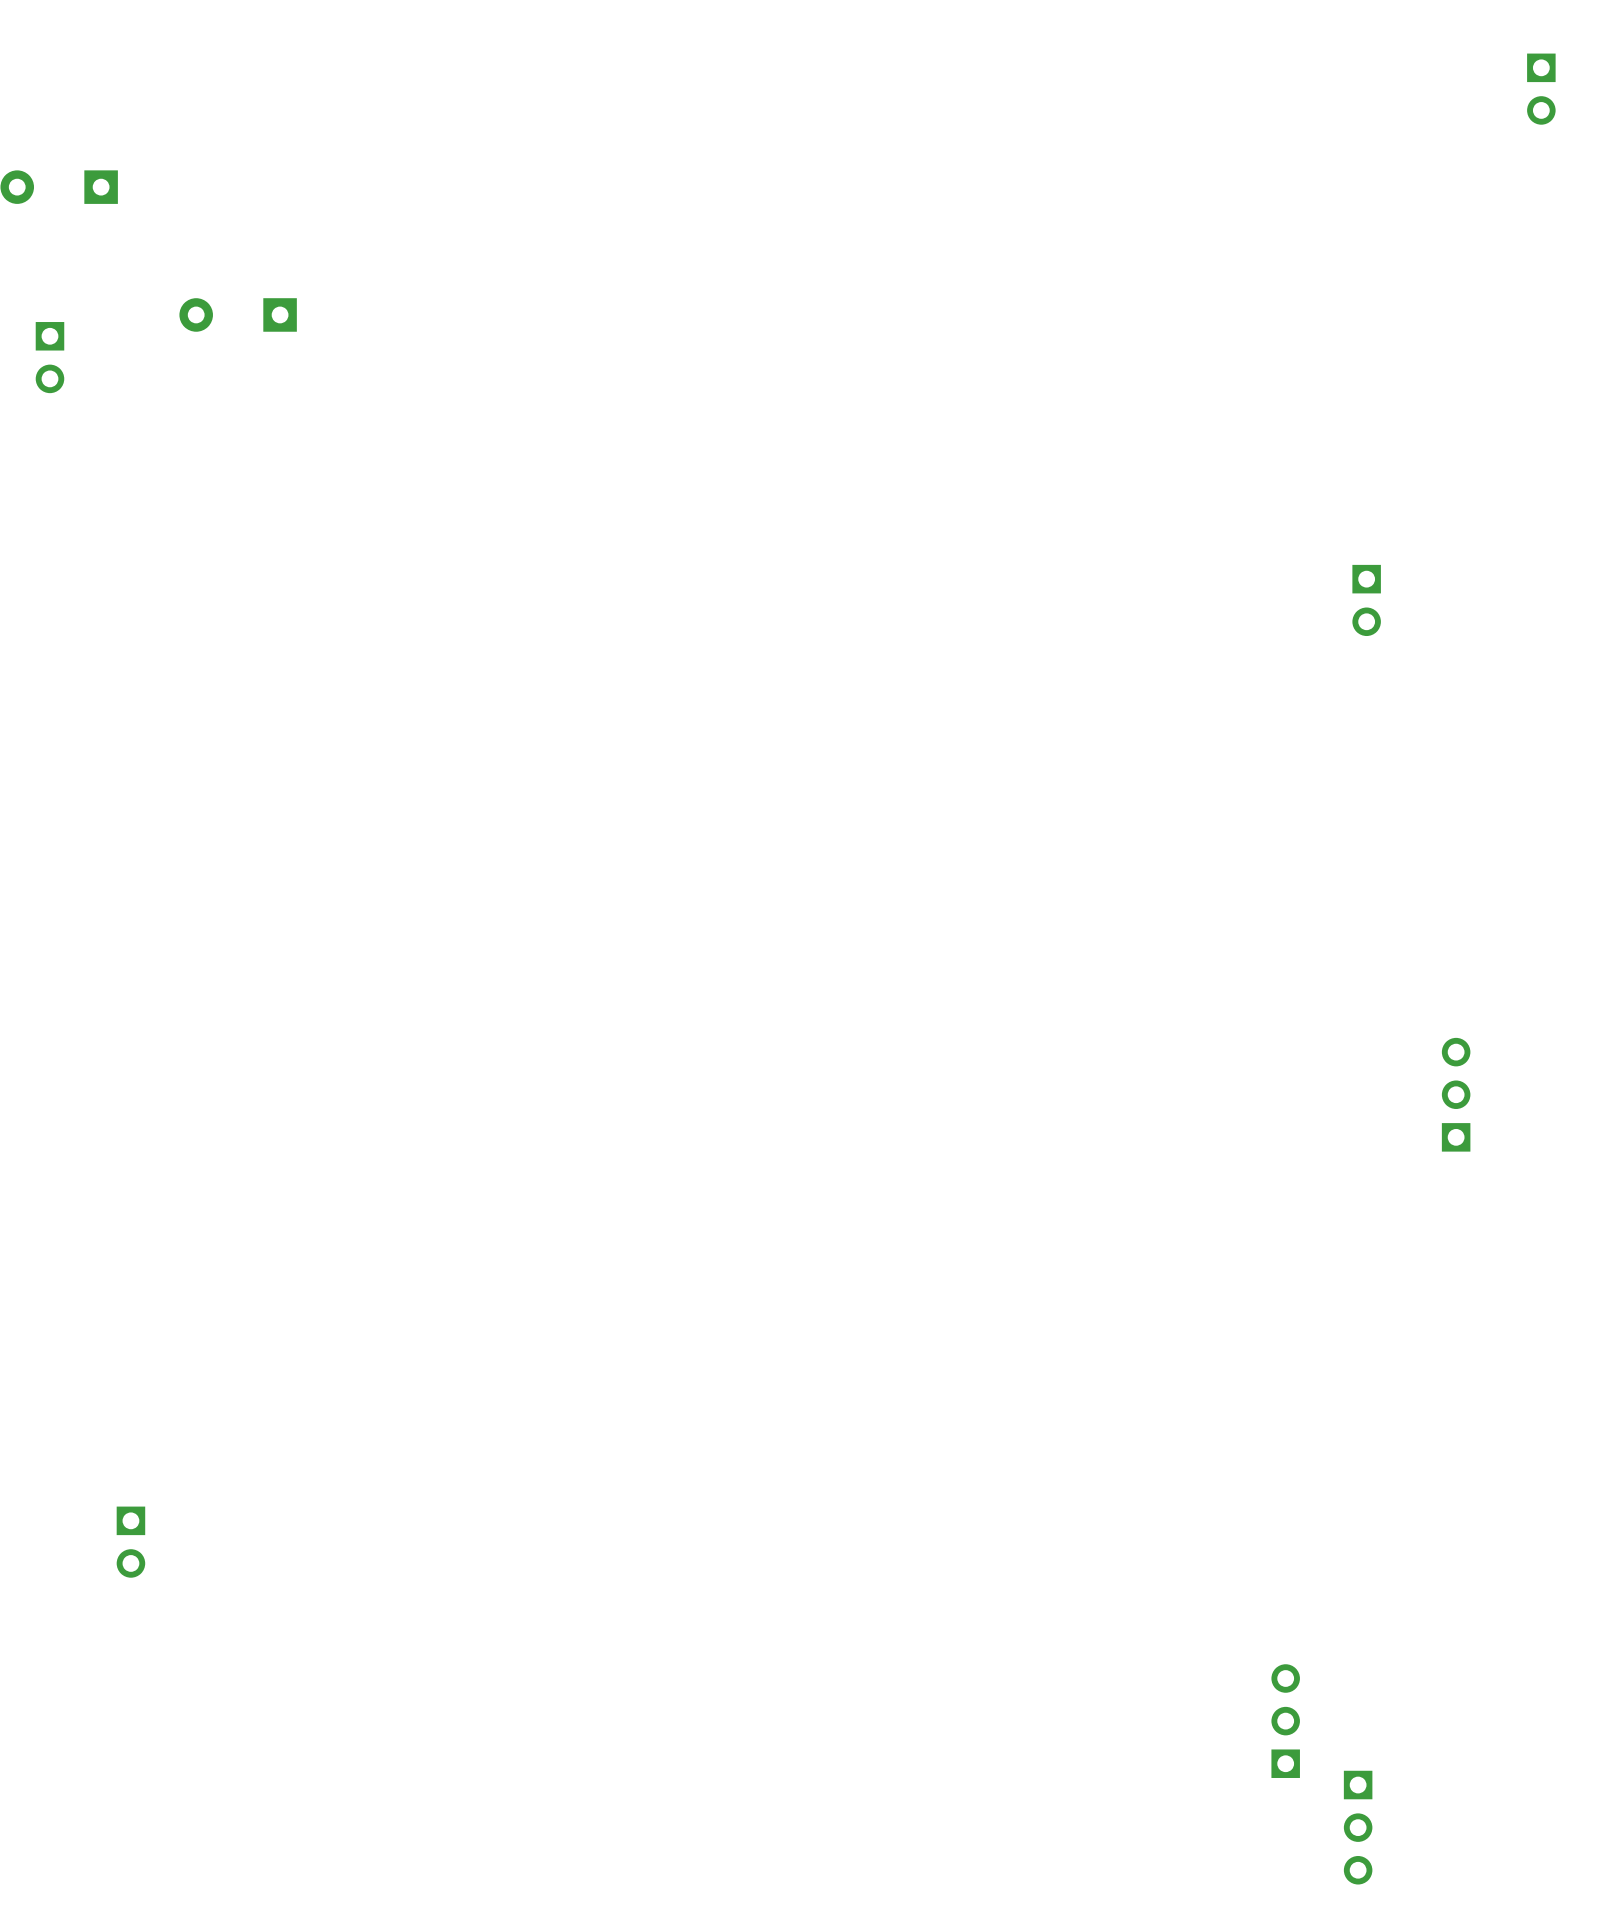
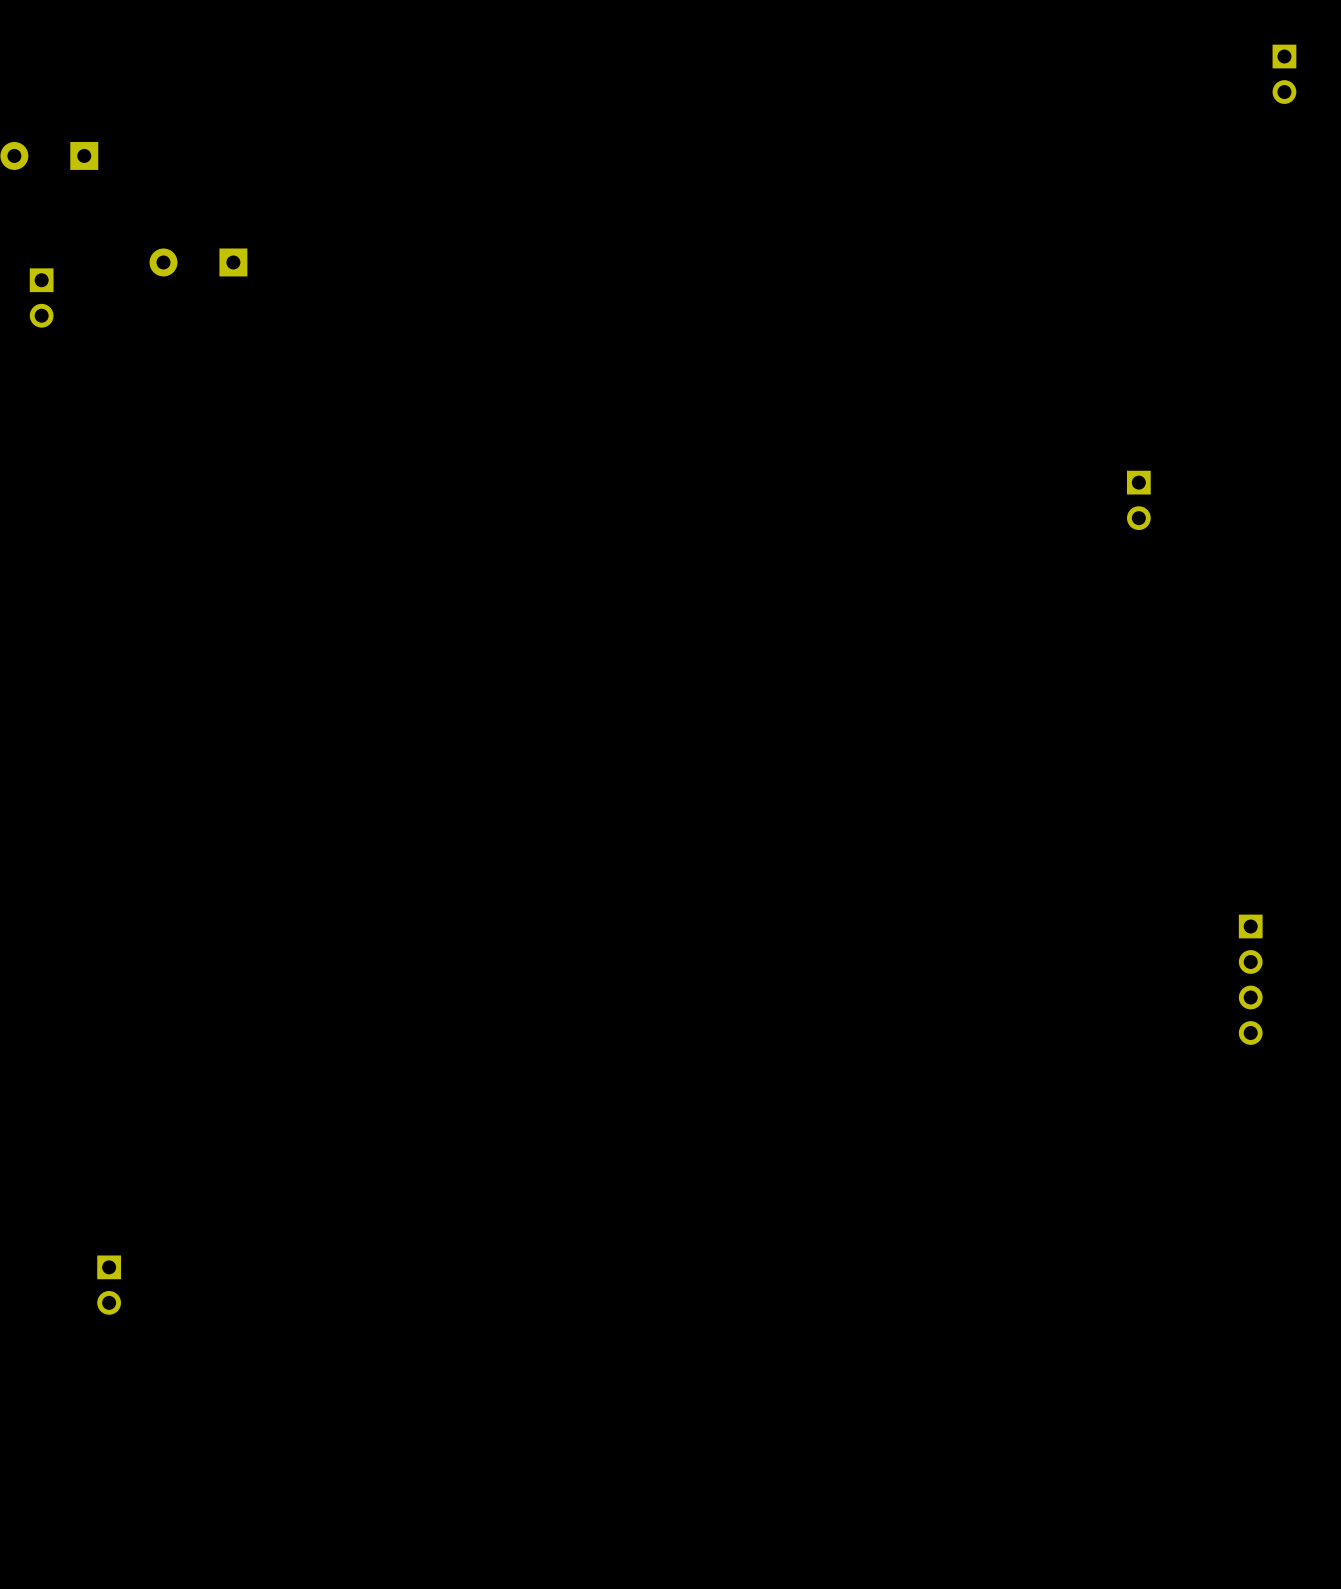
part: (1456, 1094) -> none
part: none -> (1250, 979)
part: (1285, 1721) -> none
part: (1358, 1827) -> none

